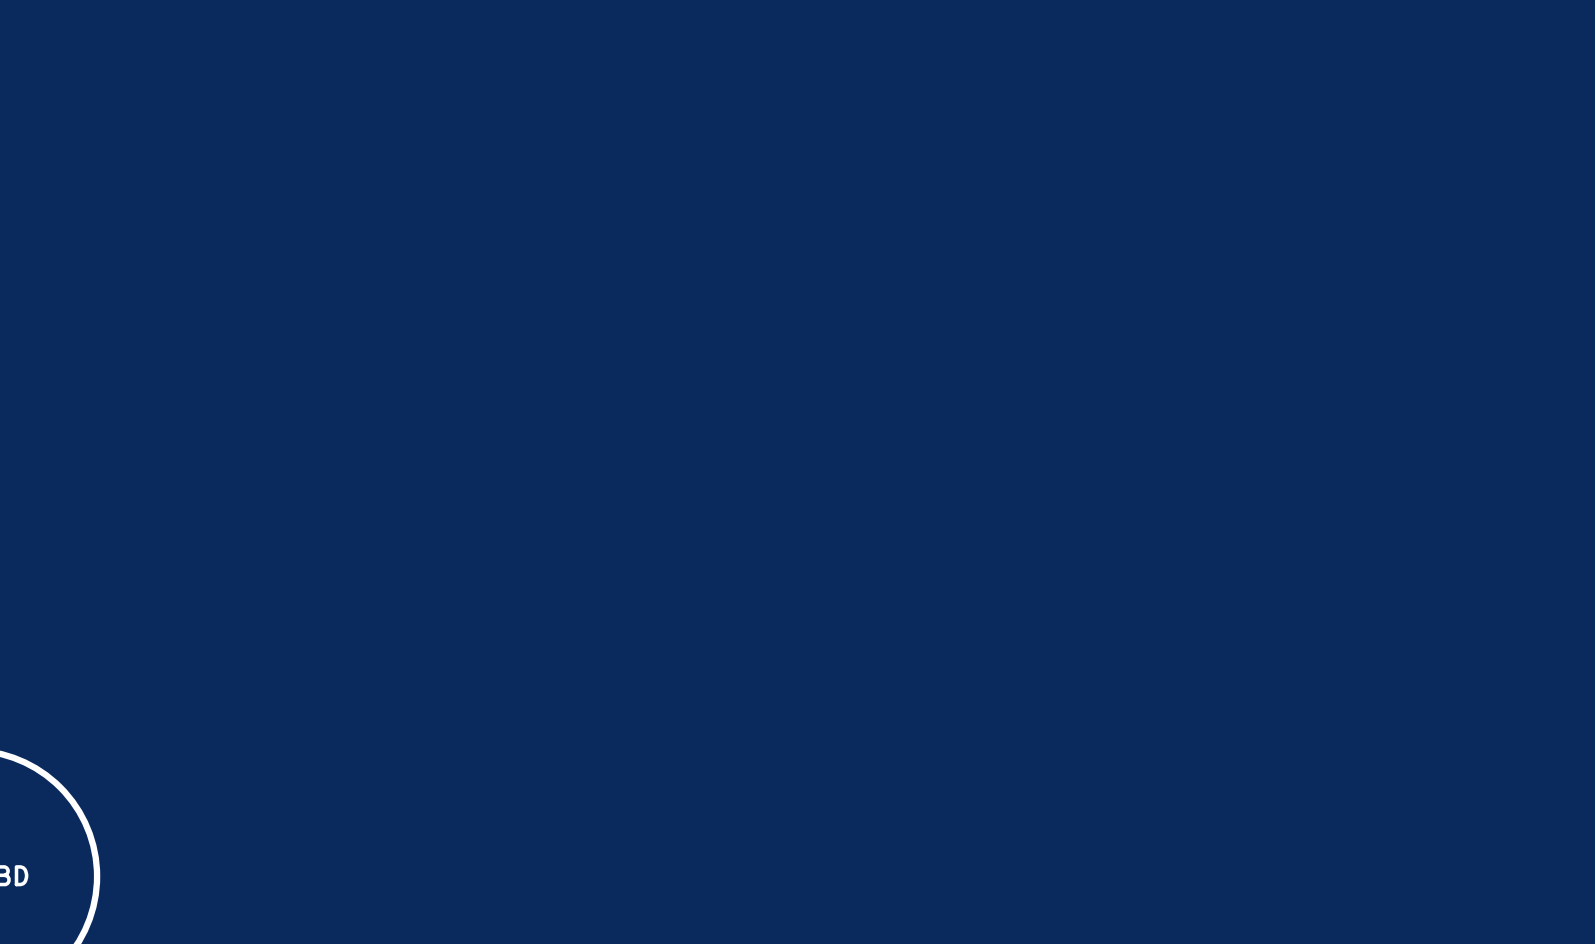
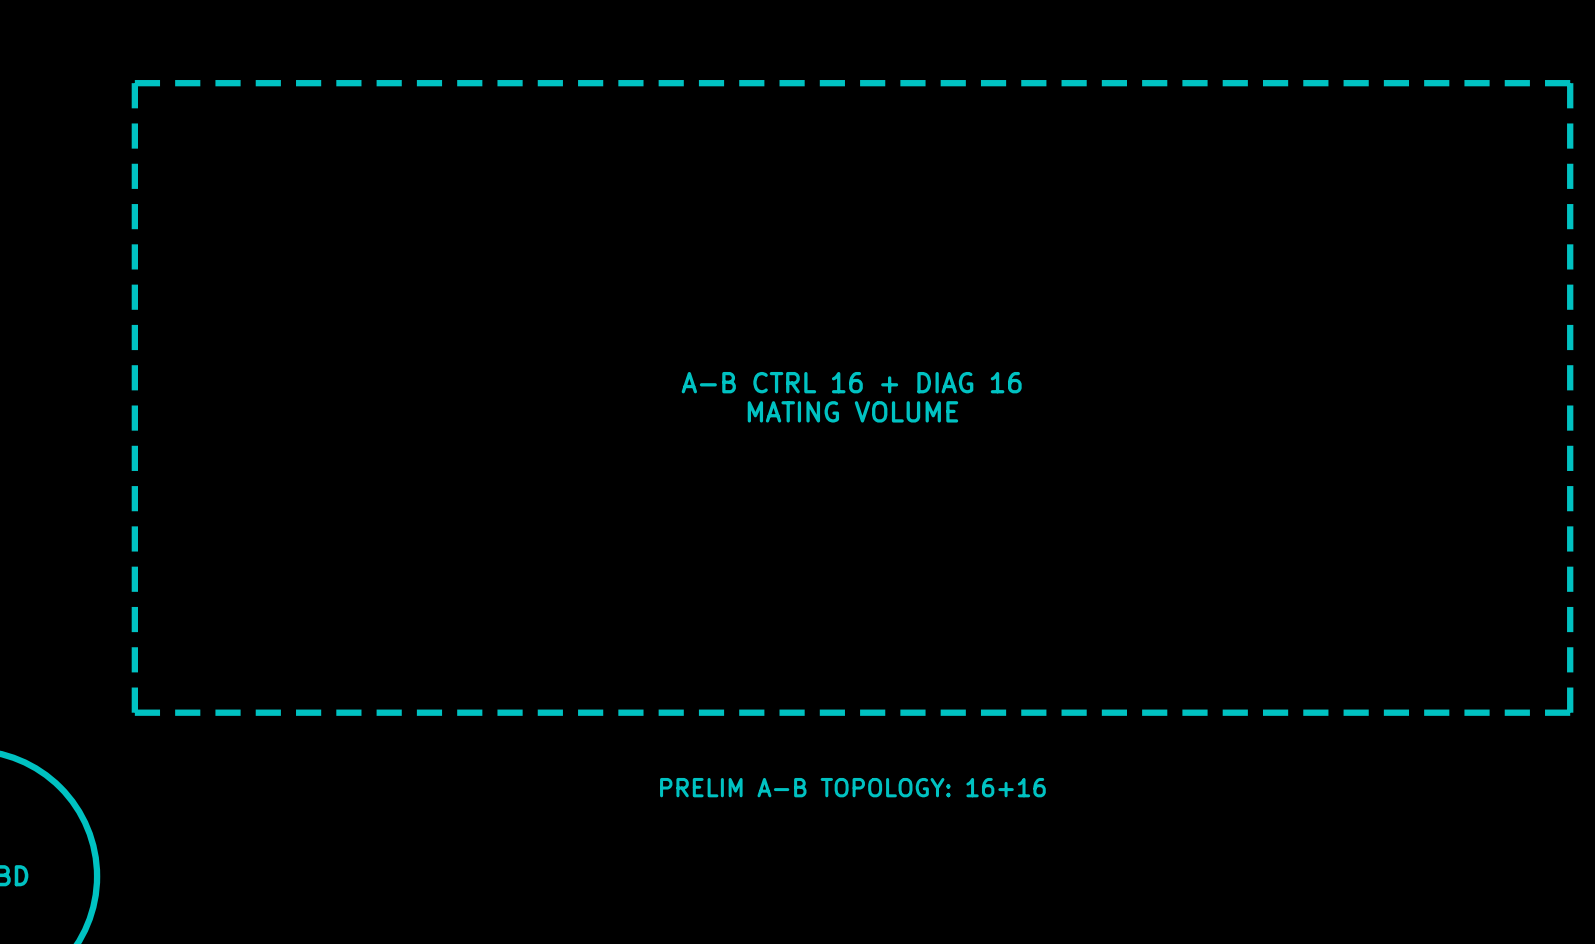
line: none -> (134, 83) (1570, 83) (1570, 712) (134, 712) (134, 83)
text: none -> A-B CTRL 16 + DIAG 16 (851, 382)
text: none -> MATING VOLUME (852, 411)
text: none -> PRELIM A-B TOPOLOGY: 16+16 (852, 787)

